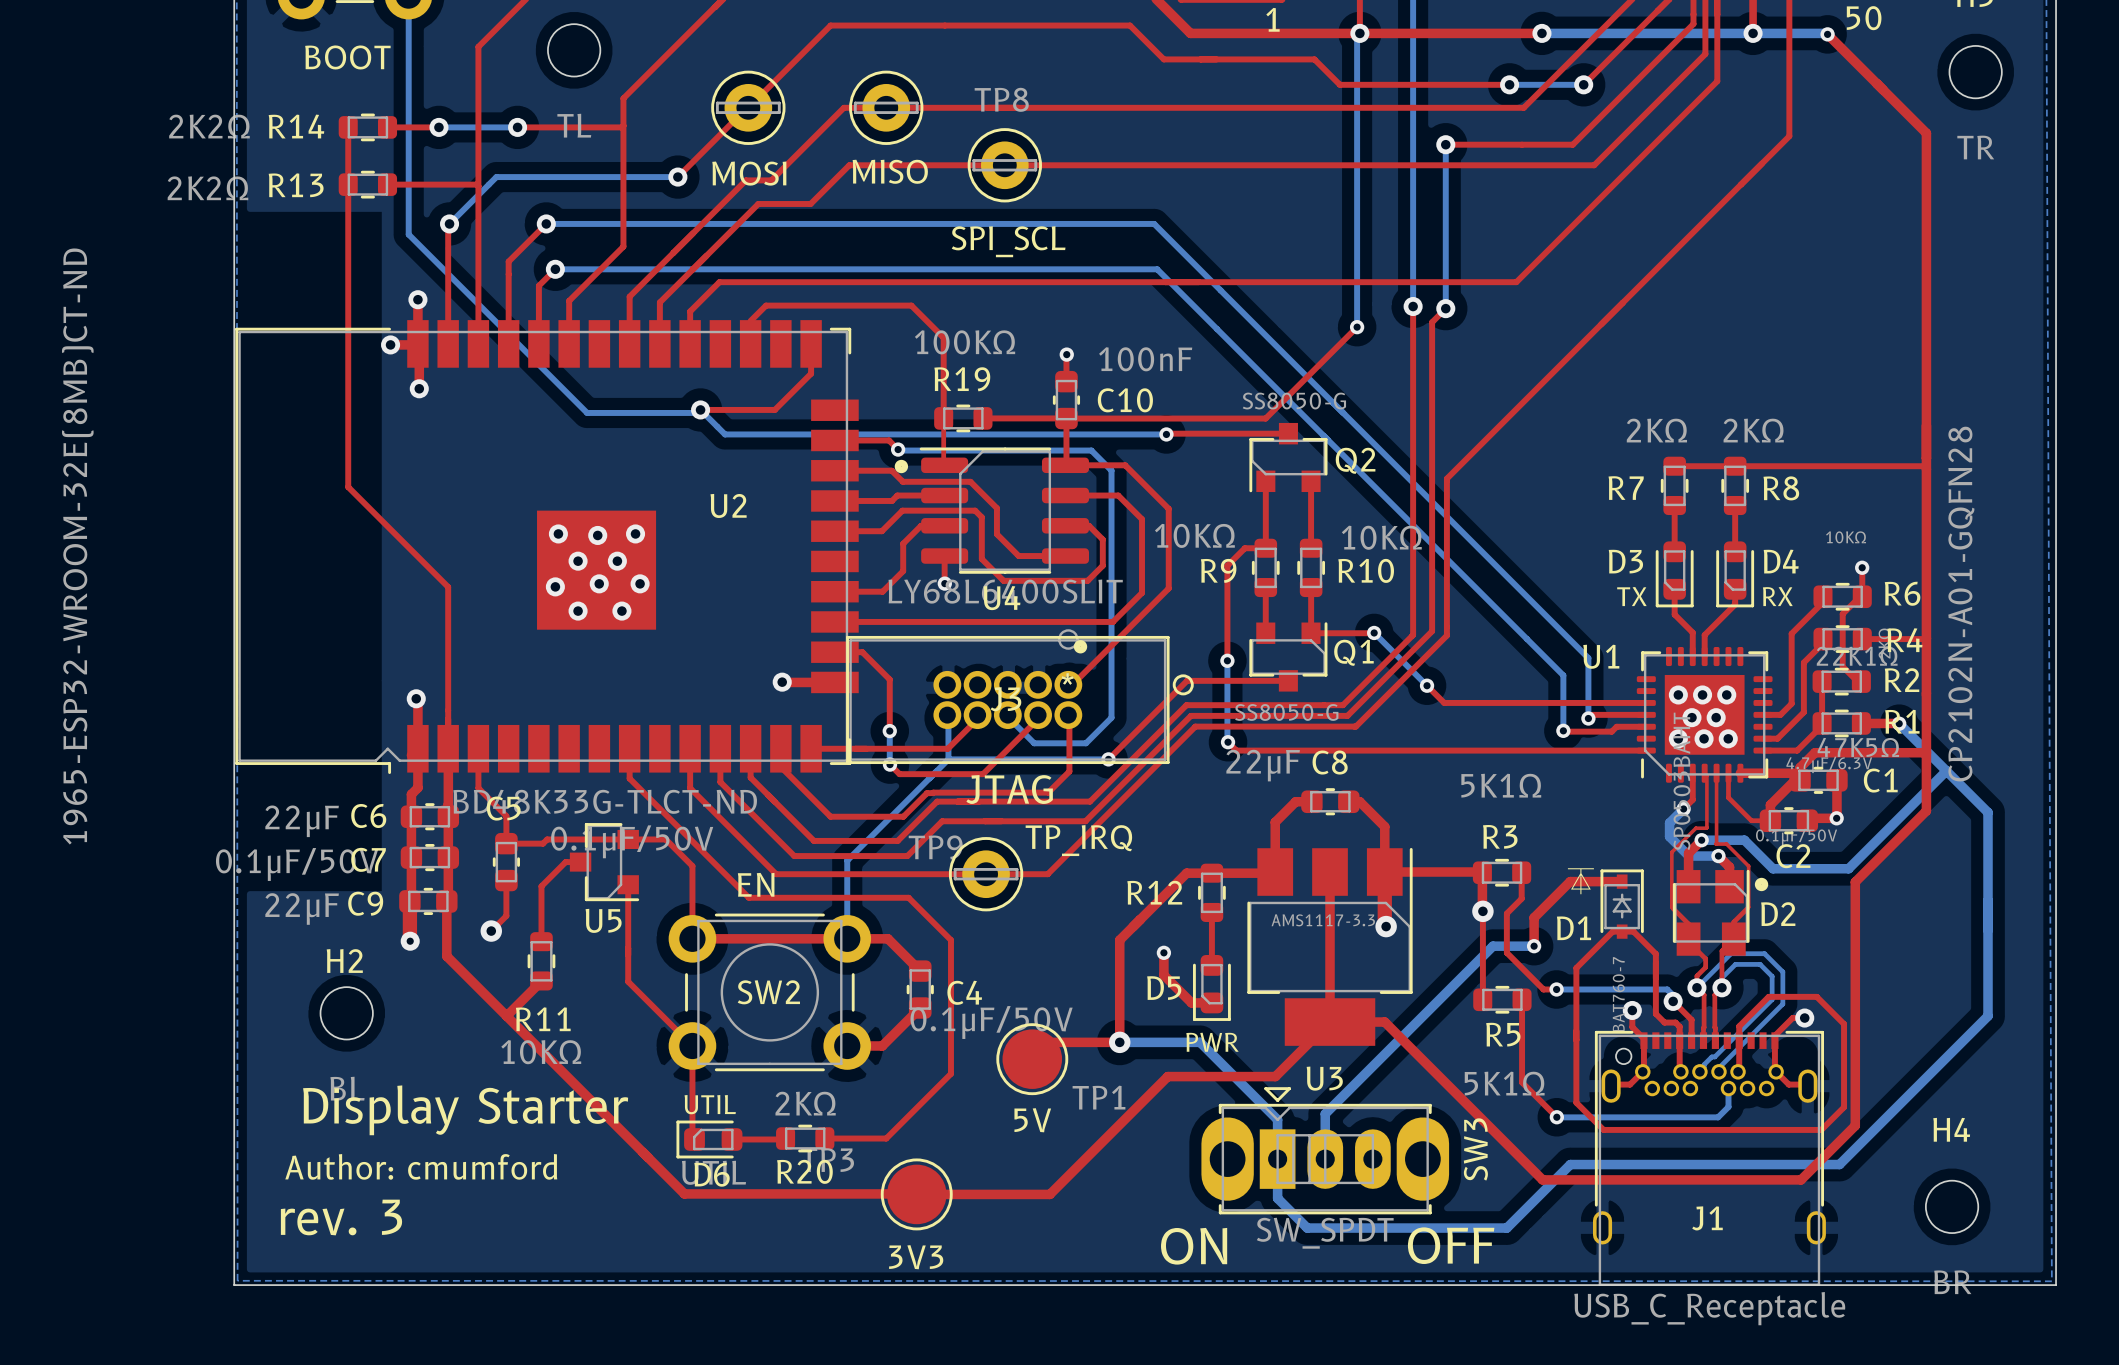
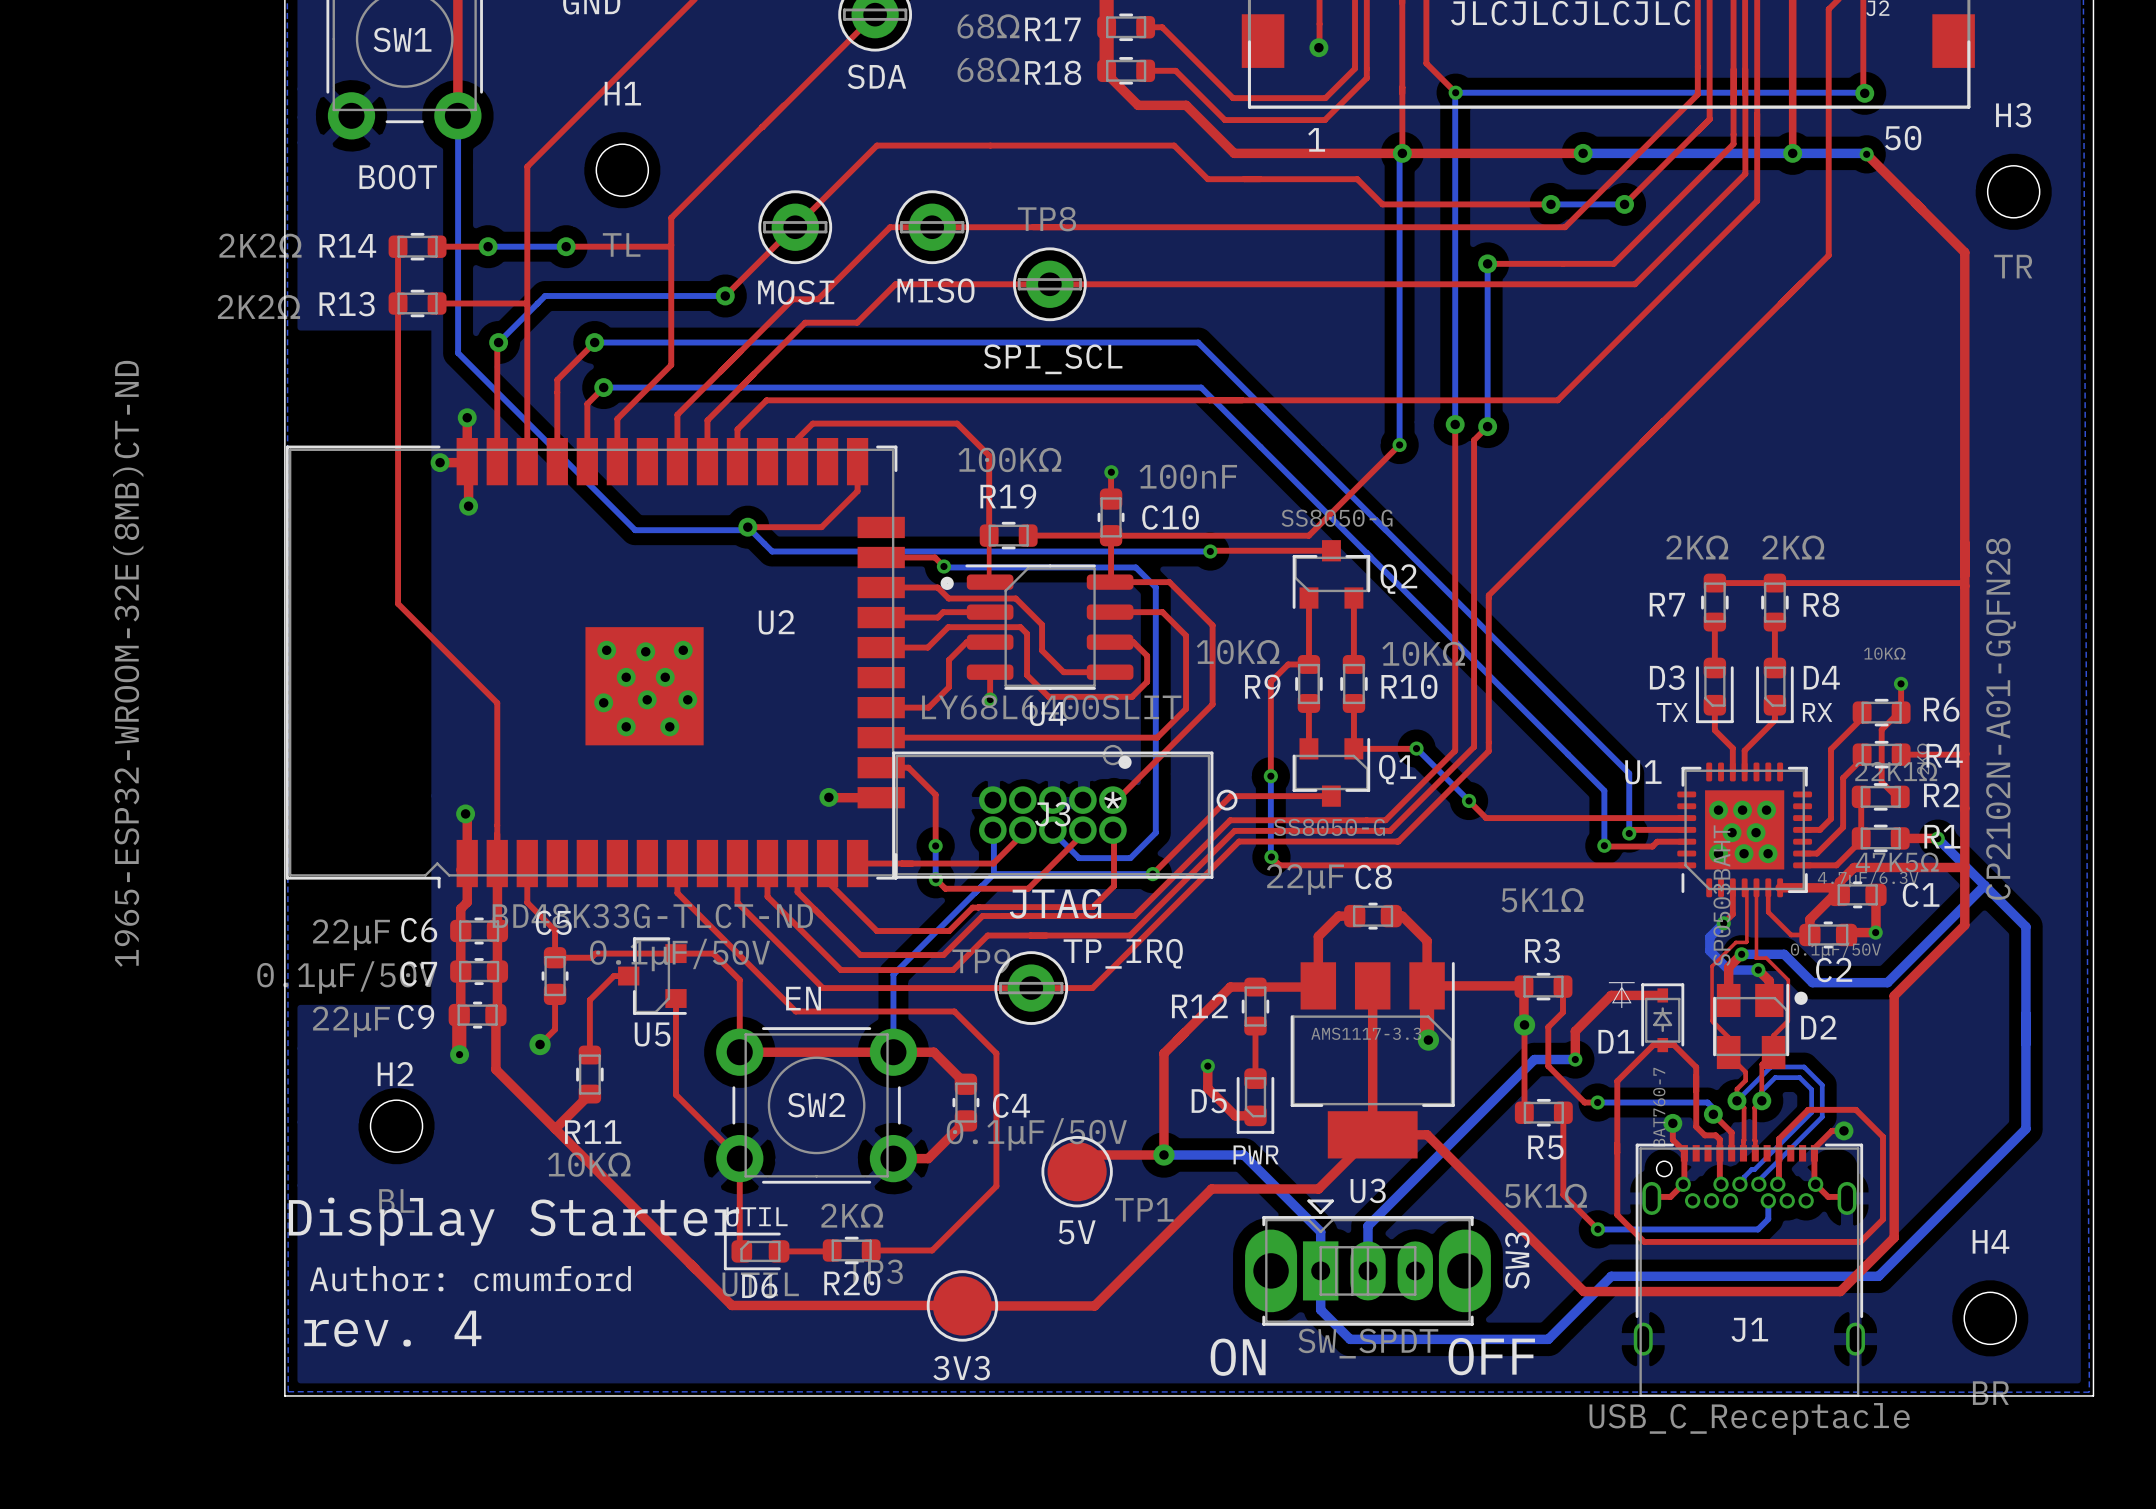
text: rev. 3 (341, 1217) -> rev. 4 (392, 1328)

